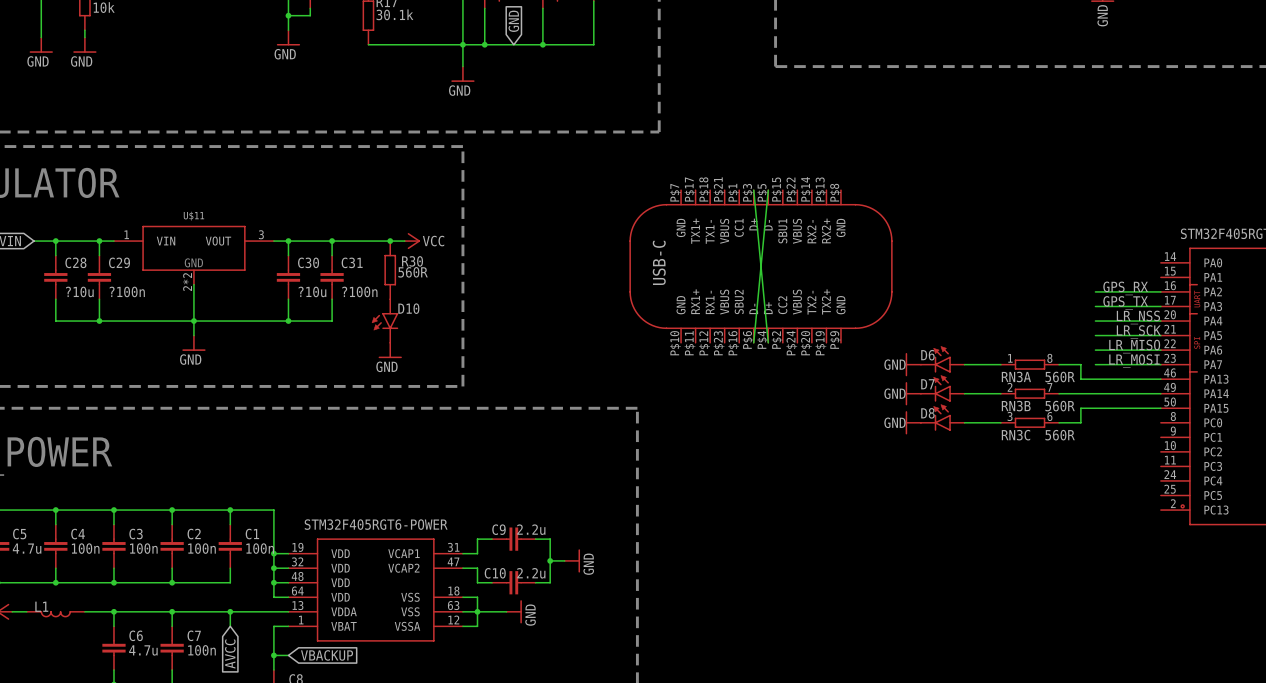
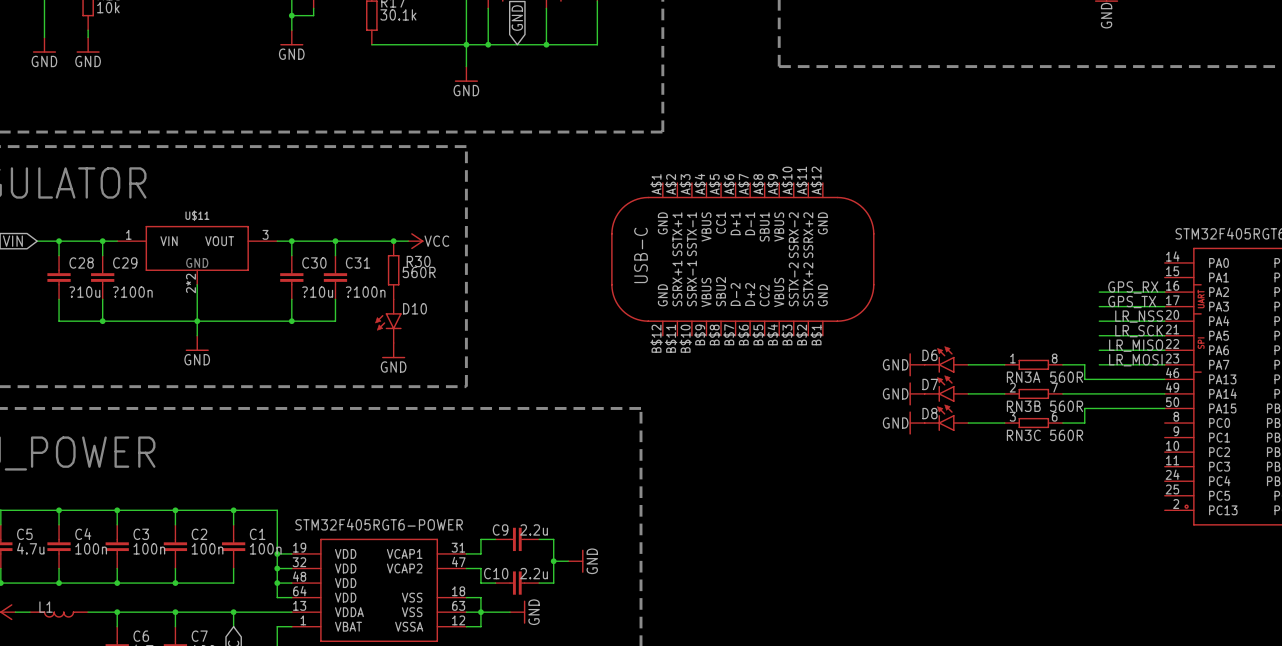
wire: (753, 190) (768, 342) -> none
wire: (768, 190) (753, 342) -> none
part: none -> (742, 259)
part: (761, 266) -> none

